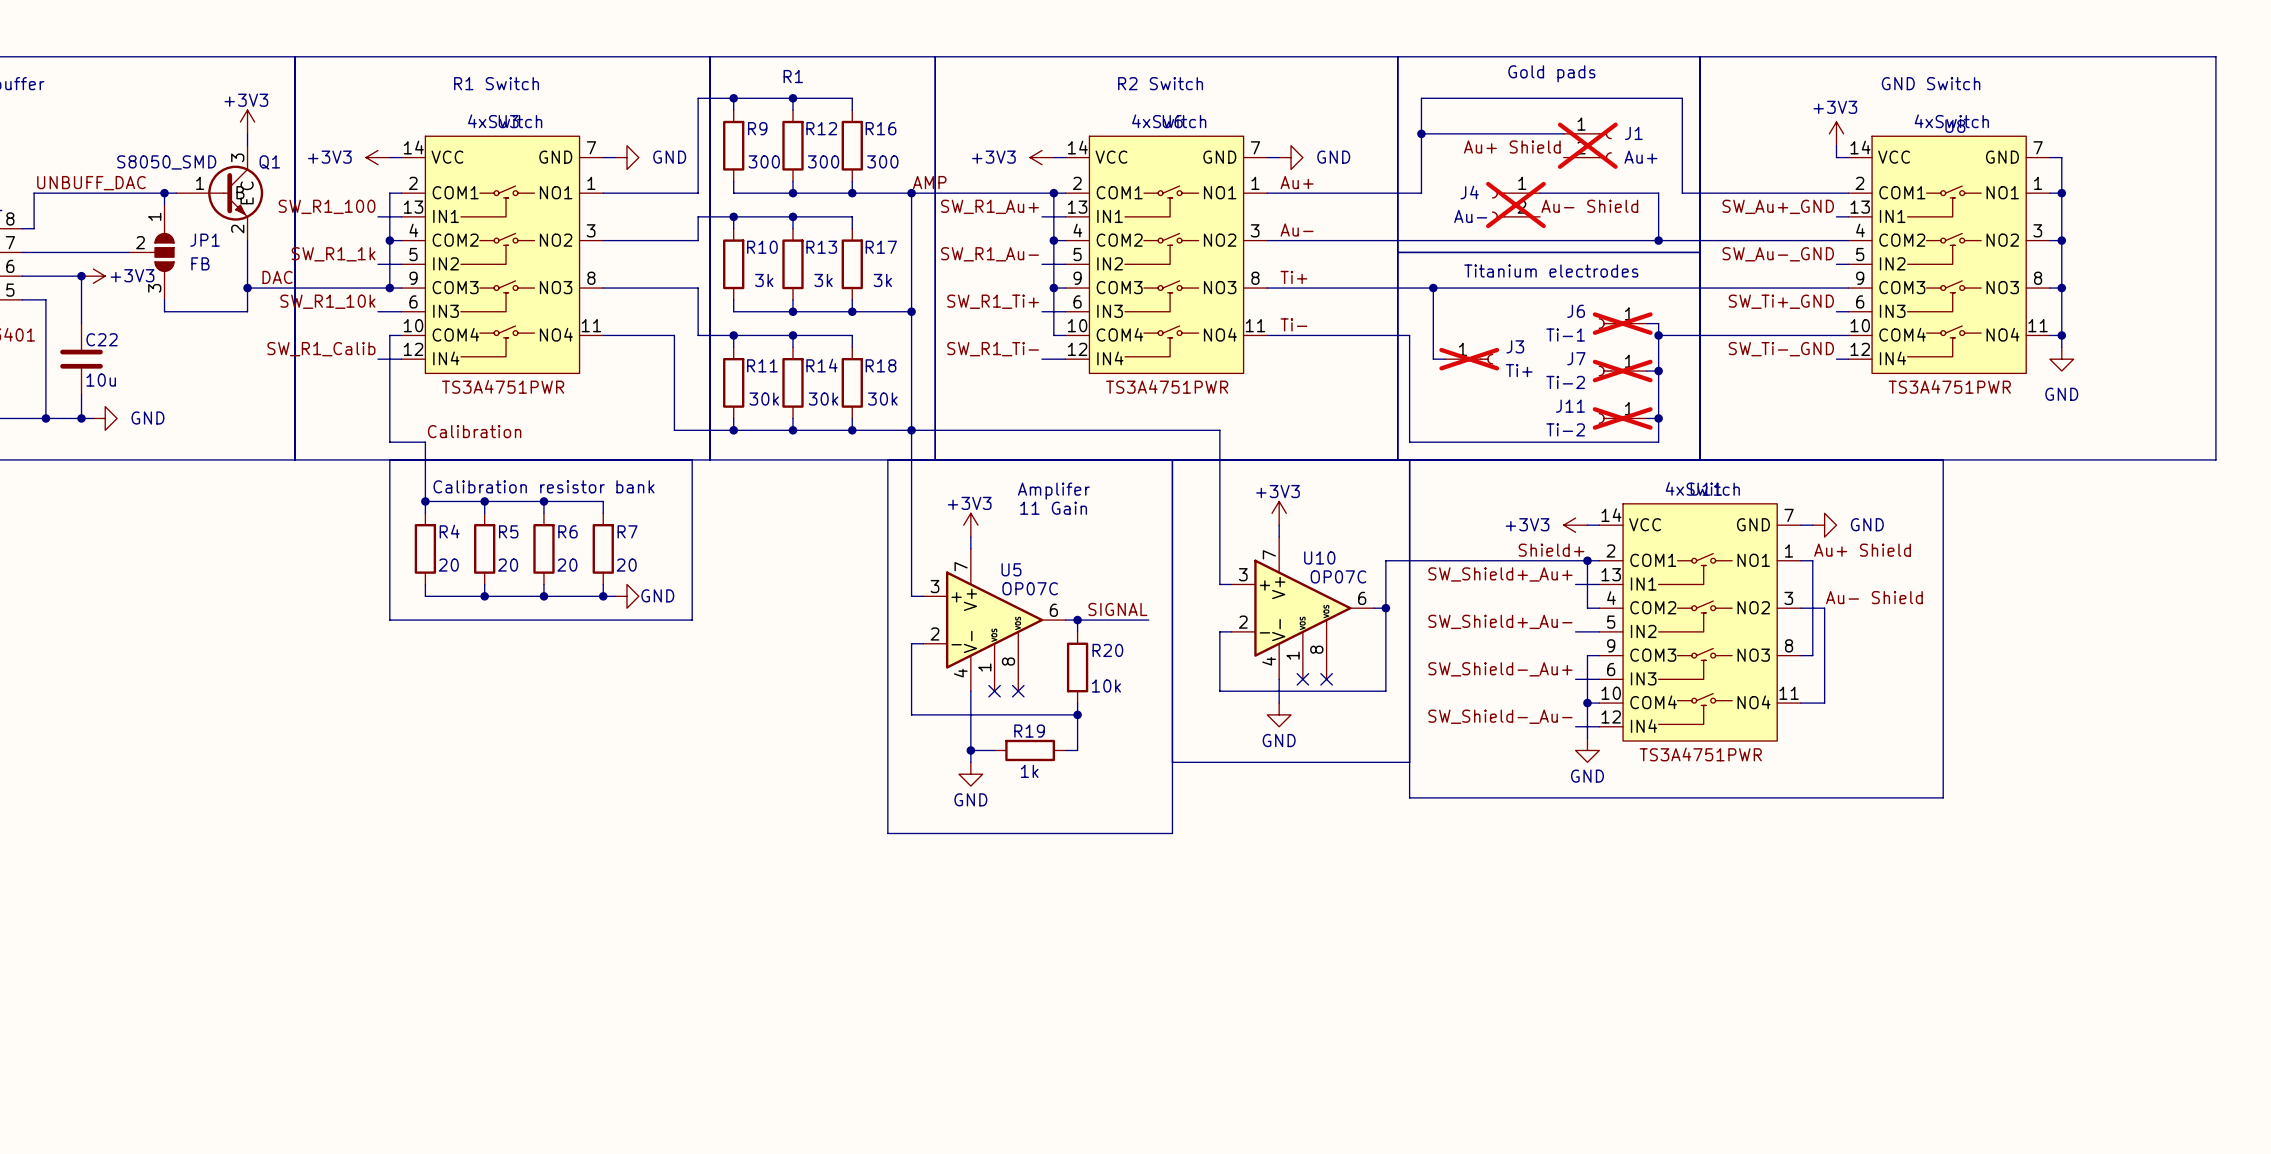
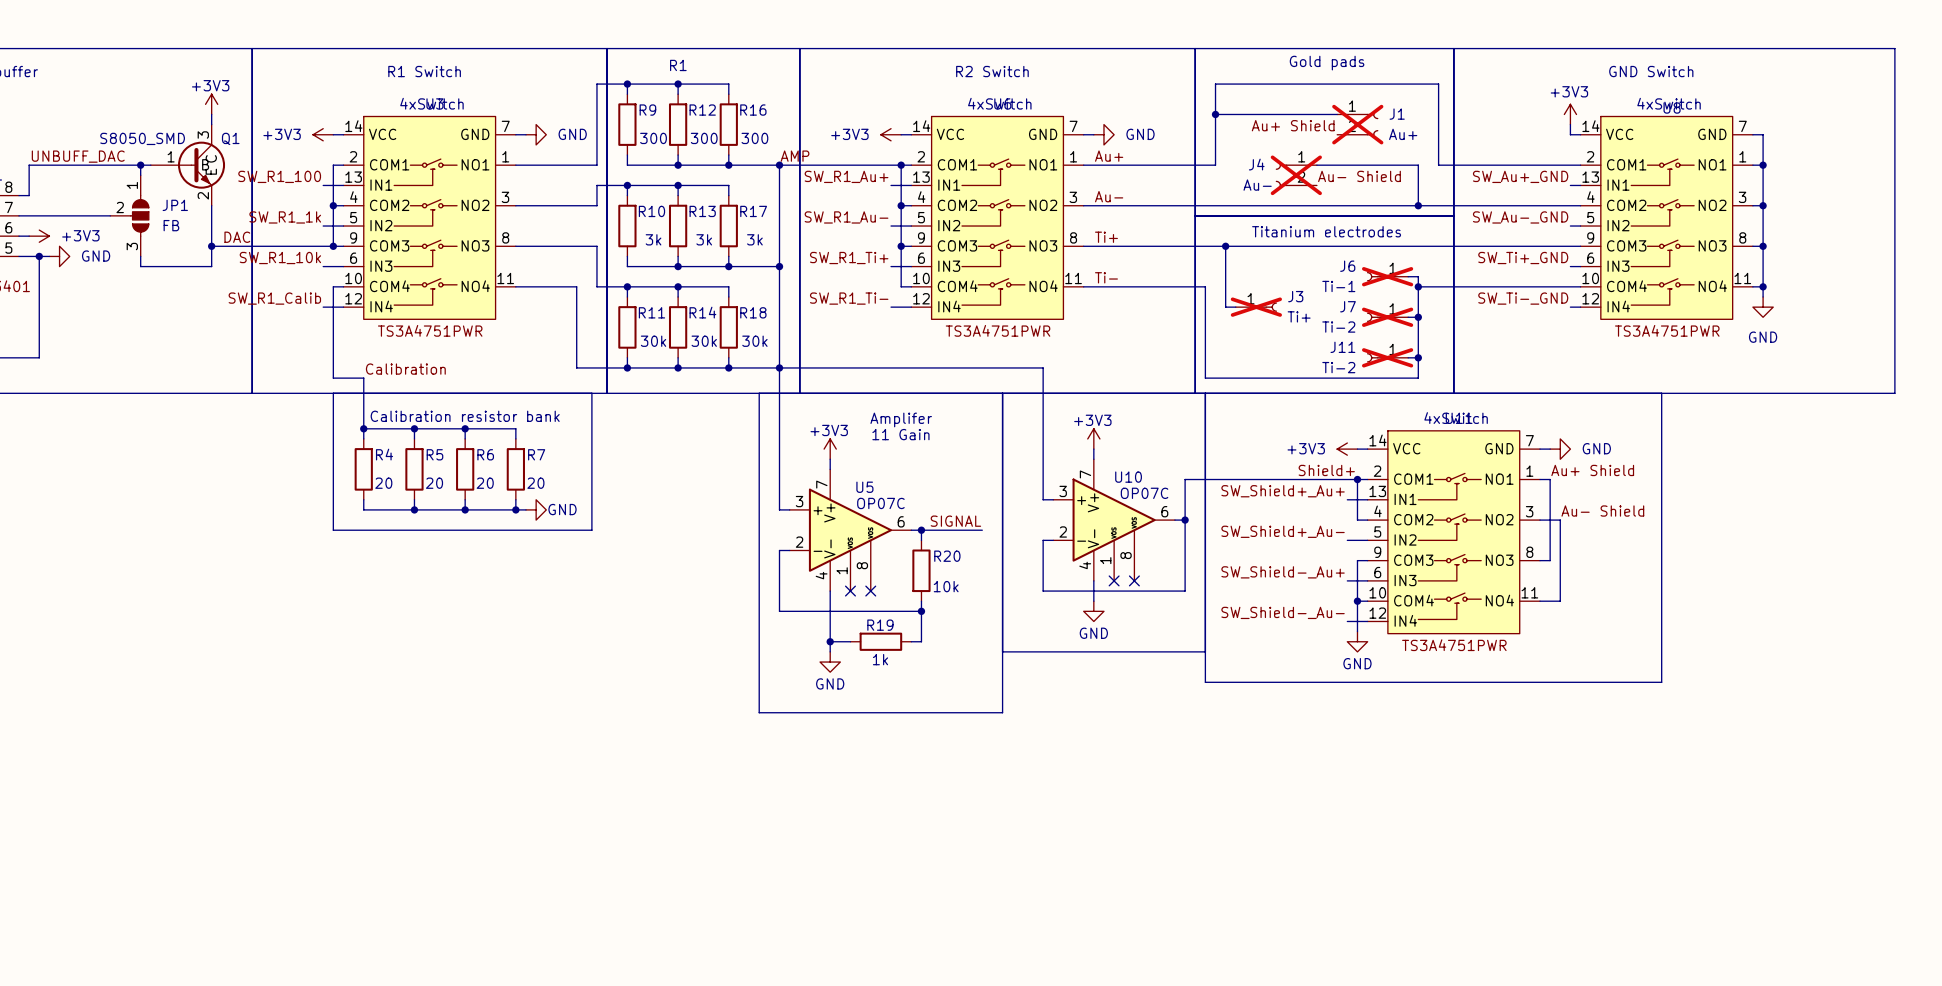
power symbol text position: +3V3 (132, 275) -> +3V3 (80, 235)
wire: (34, 276) (81, 276) (81, 323) -> none
junction position: (81, 276) -> (39, 256)
power symbol position: +3V3 (93, 276) -> +3V3 (39, 236)
wire: none -> (39, 256) (49, 256)
C22: 10u (81, 359) -> none
wire: (81, 394) (81, 418) -> none
wire: (45, 418) (93, 418) -> none
junction: (45, 418) -> none
junction: (81, 418) -> none
power symbol position: GND (105, 418) -> GND (59, 256)

